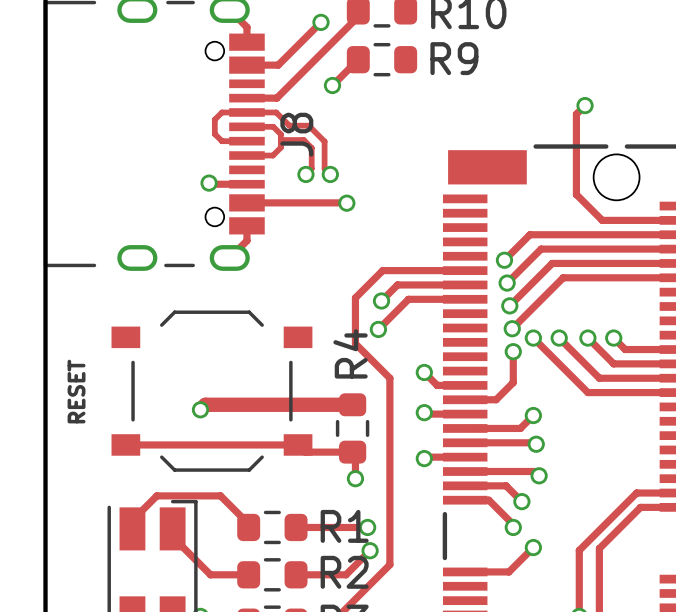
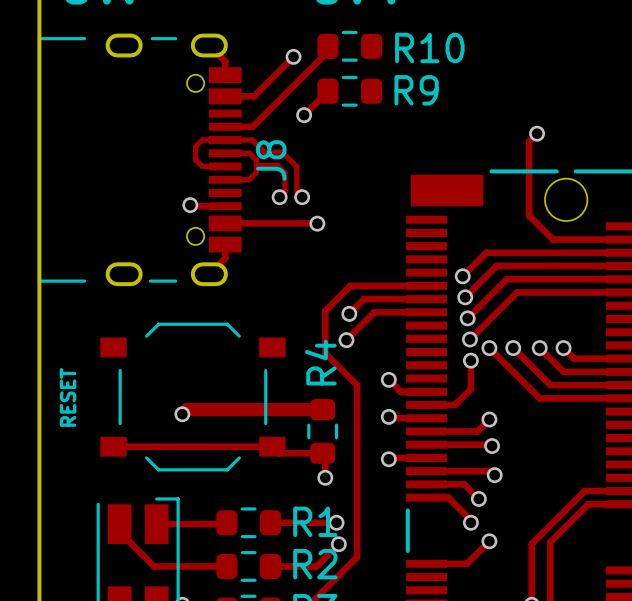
track: (132, 520) (156, 495) (220, 495) (248, 524) -> none
track: none -> (226, 522) (156, 524)
track: (172, 536) (210, 574) -> (119, 524) (119, 532) (154, 566) (191, 566)

